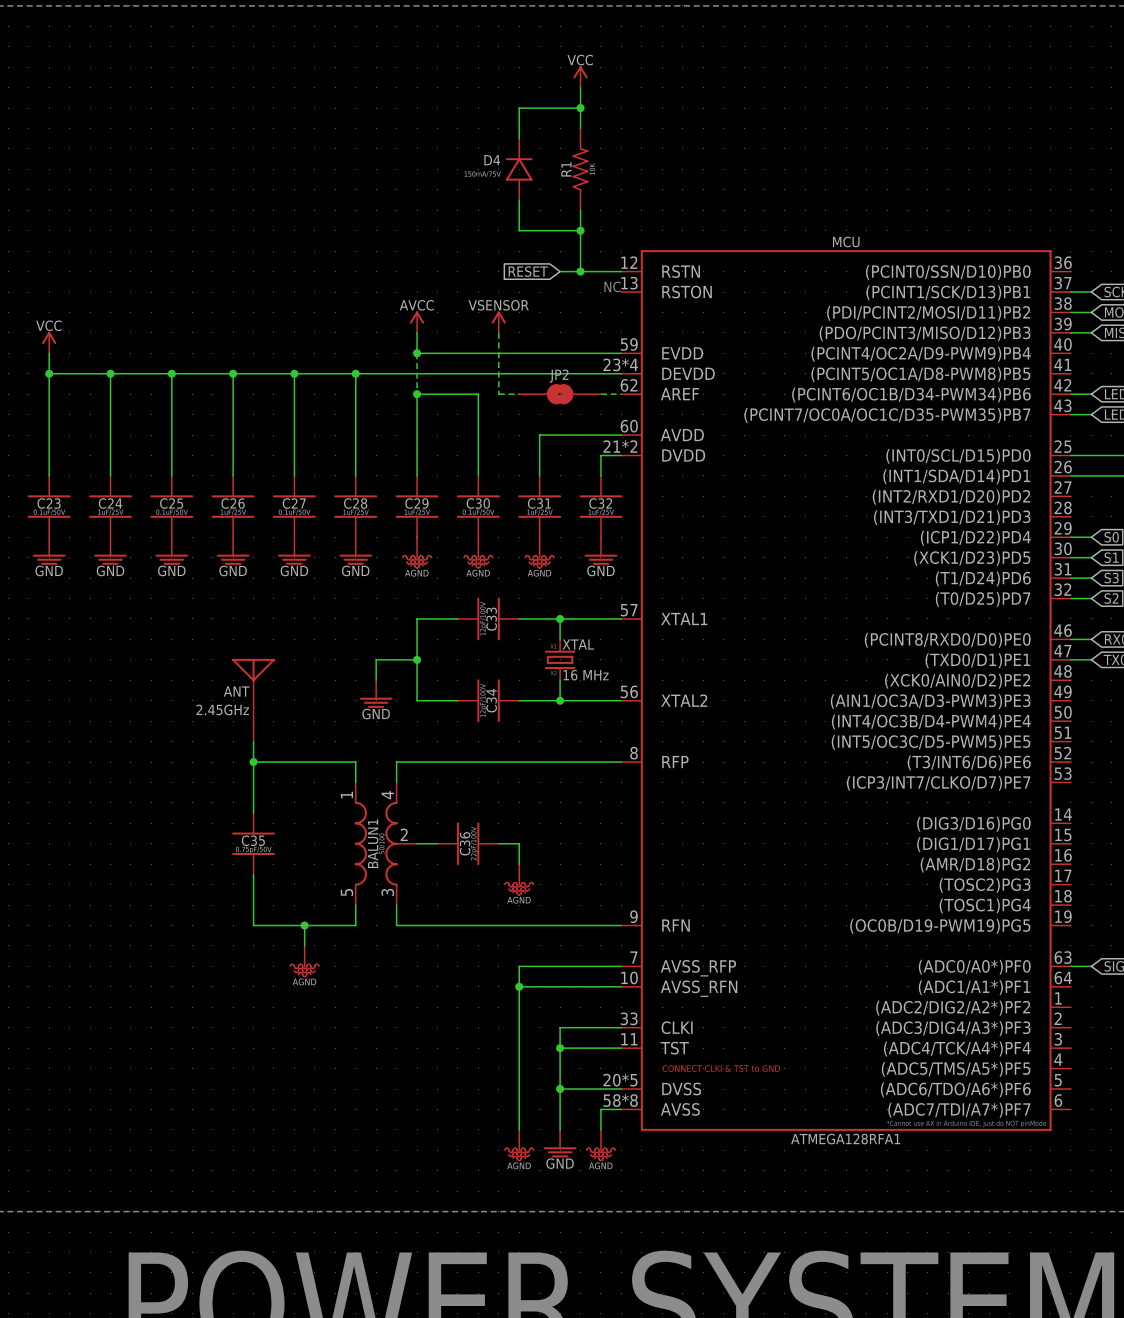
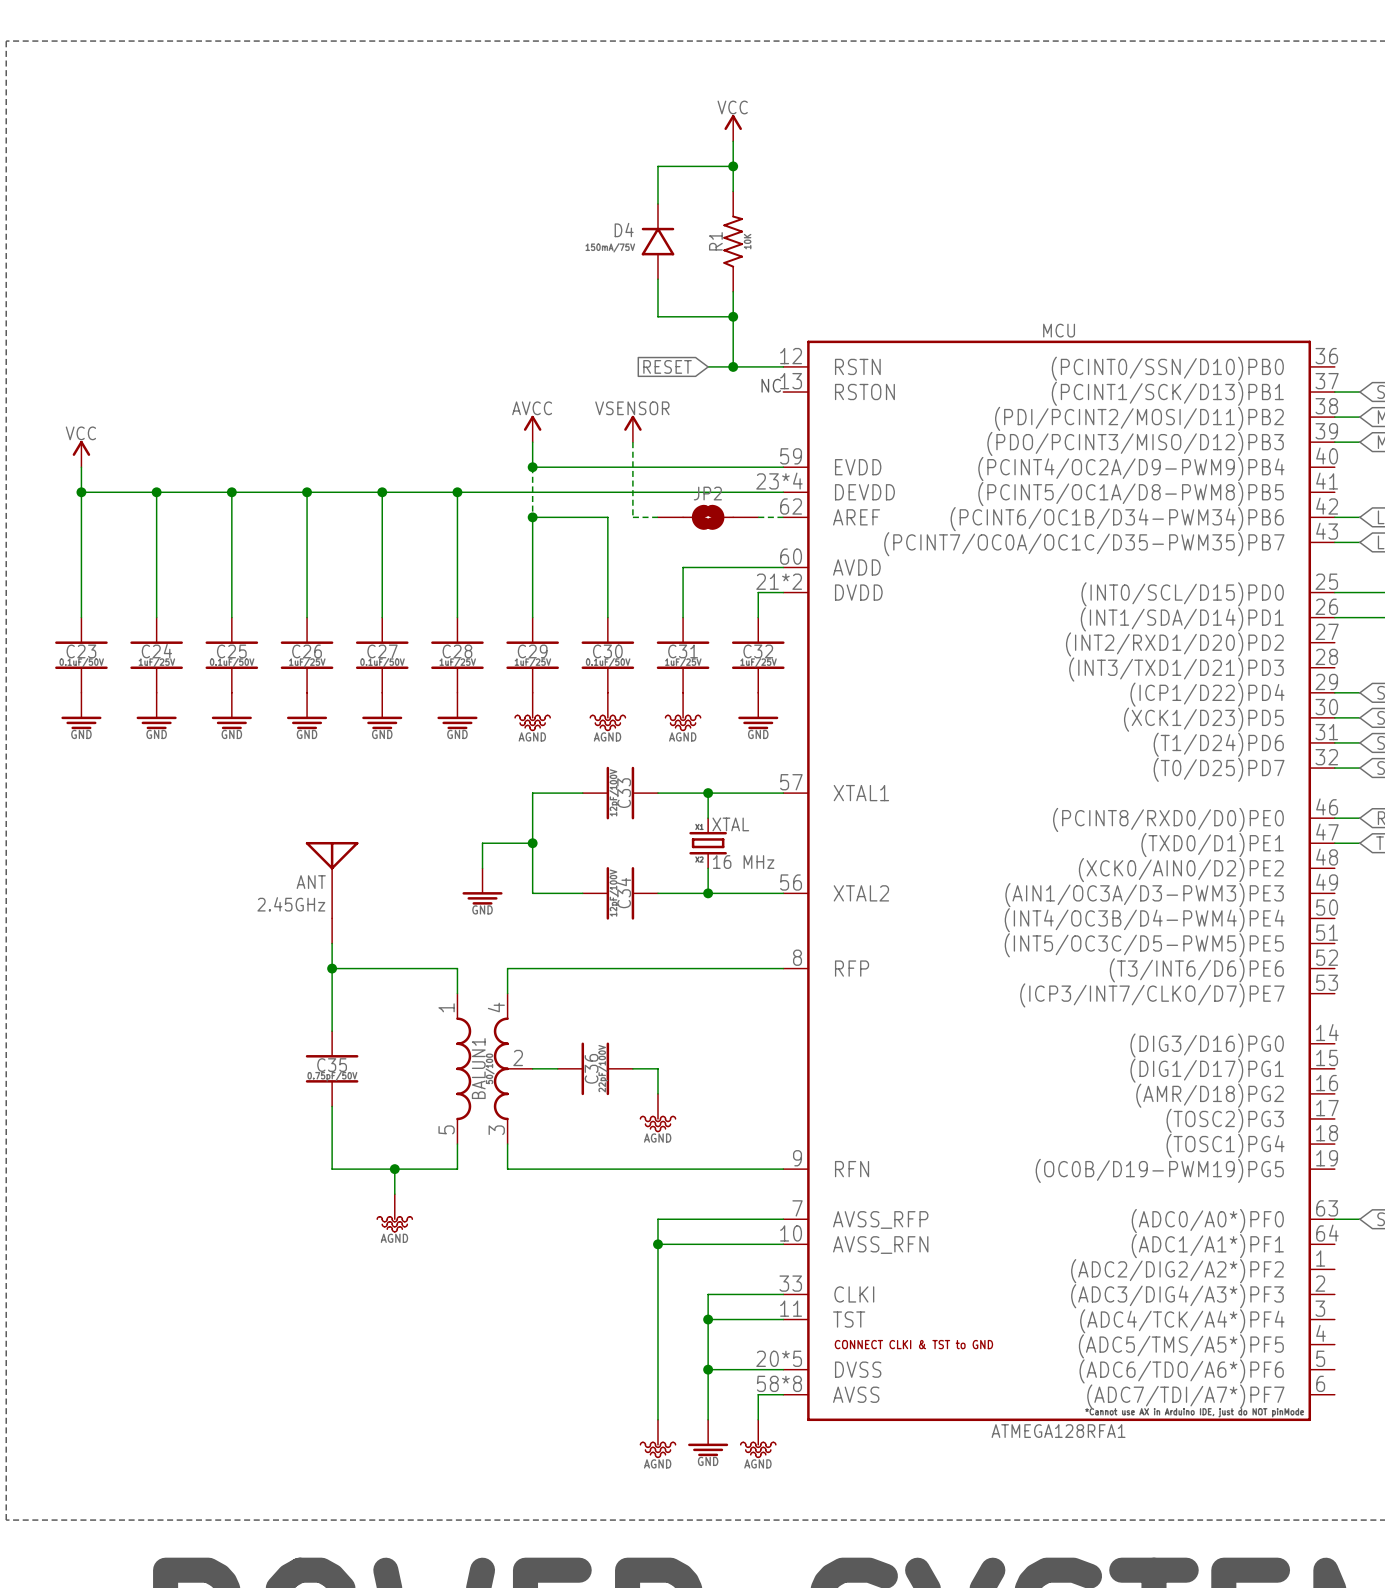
power symbol shape: [32, 536, 66, 565] -> [61, 692, 102, 730]
power symbol shape: [94, 536, 127, 565] -> [136, 692, 177, 730]
power symbol shape: [155, 536, 189, 565] -> [211, 692, 252, 730]
power symbol shape: [216, 536, 250, 565] -> [286, 692, 328, 730]
power symbol shape: [278, 536, 311, 565] -> [362, 692, 403, 730]
power symbol shape: [339, 536, 373, 565] -> [437, 692, 478, 730]
power symbol shape: [584, 536, 618, 565] -> [738, 692, 779, 730]
power symbol shape: [359, 679, 393, 708] -> [462, 868, 503, 905]
power symbol shape: [543, 1129, 577, 1158] -> [688, 1419, 729, 1457]

